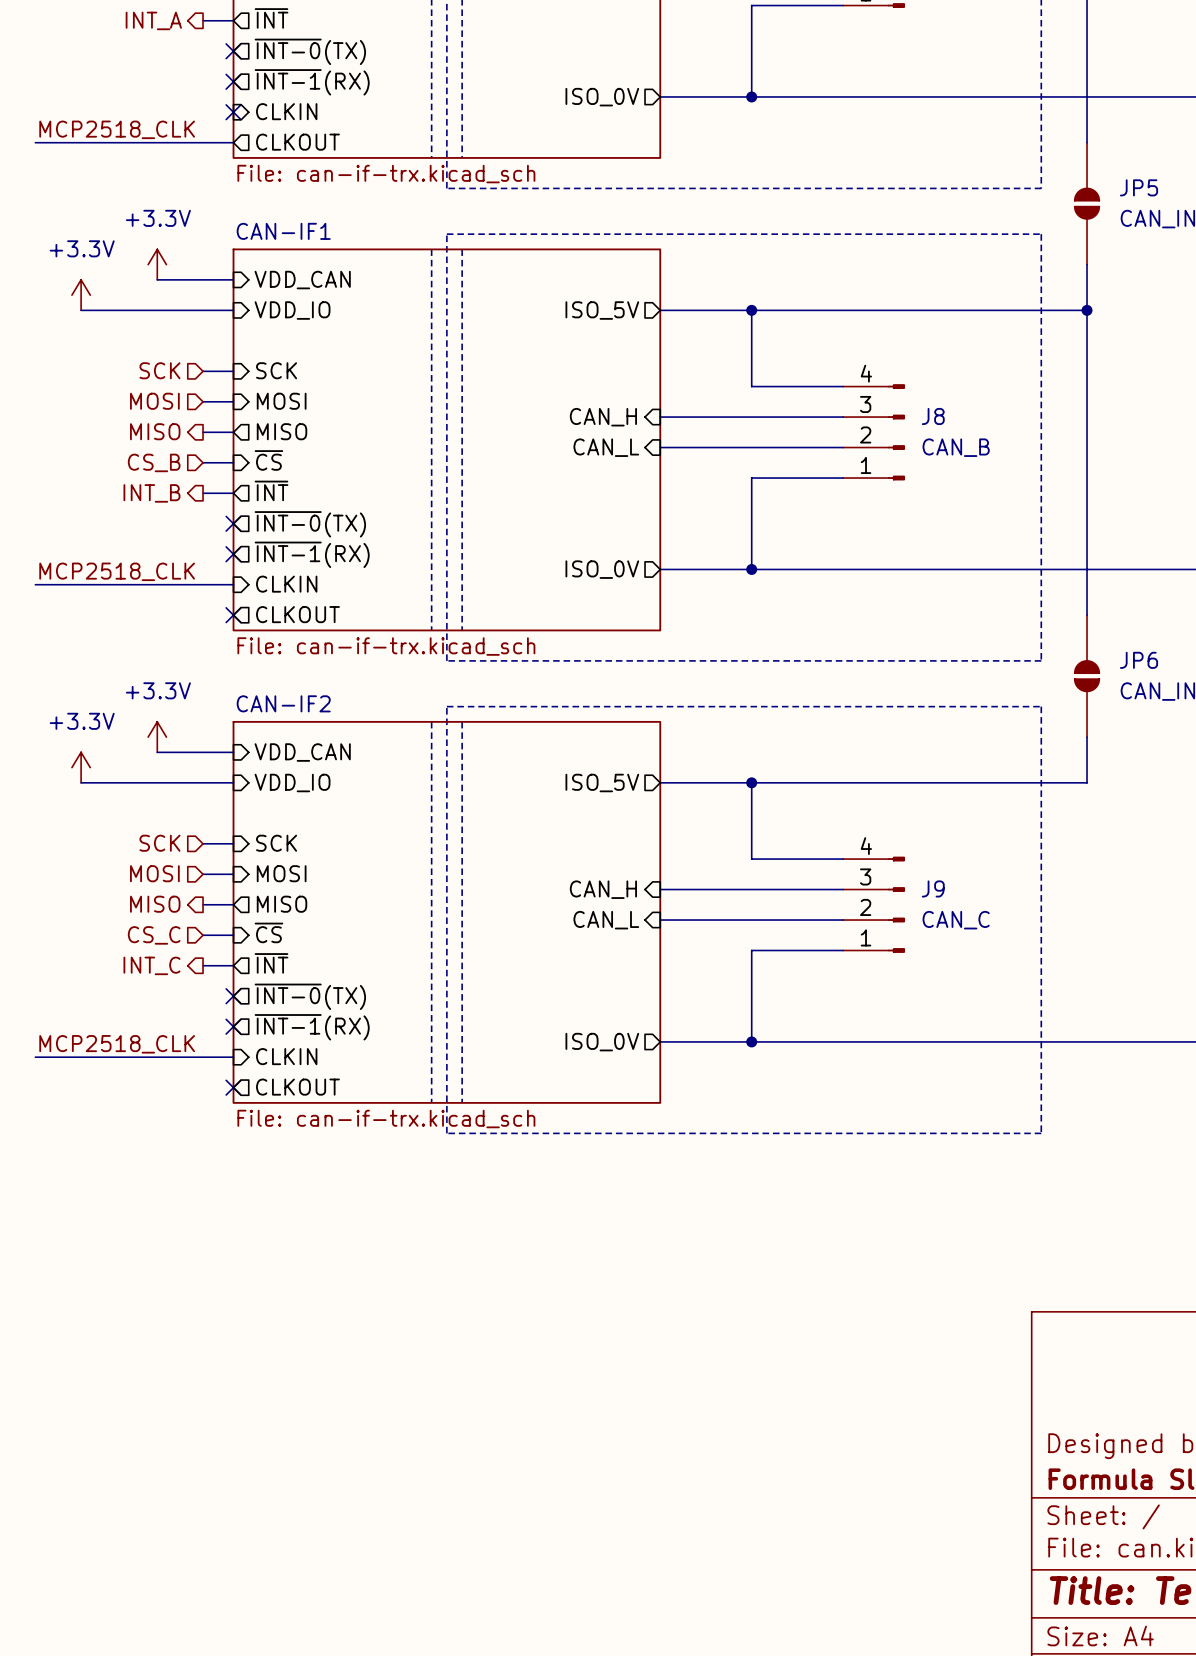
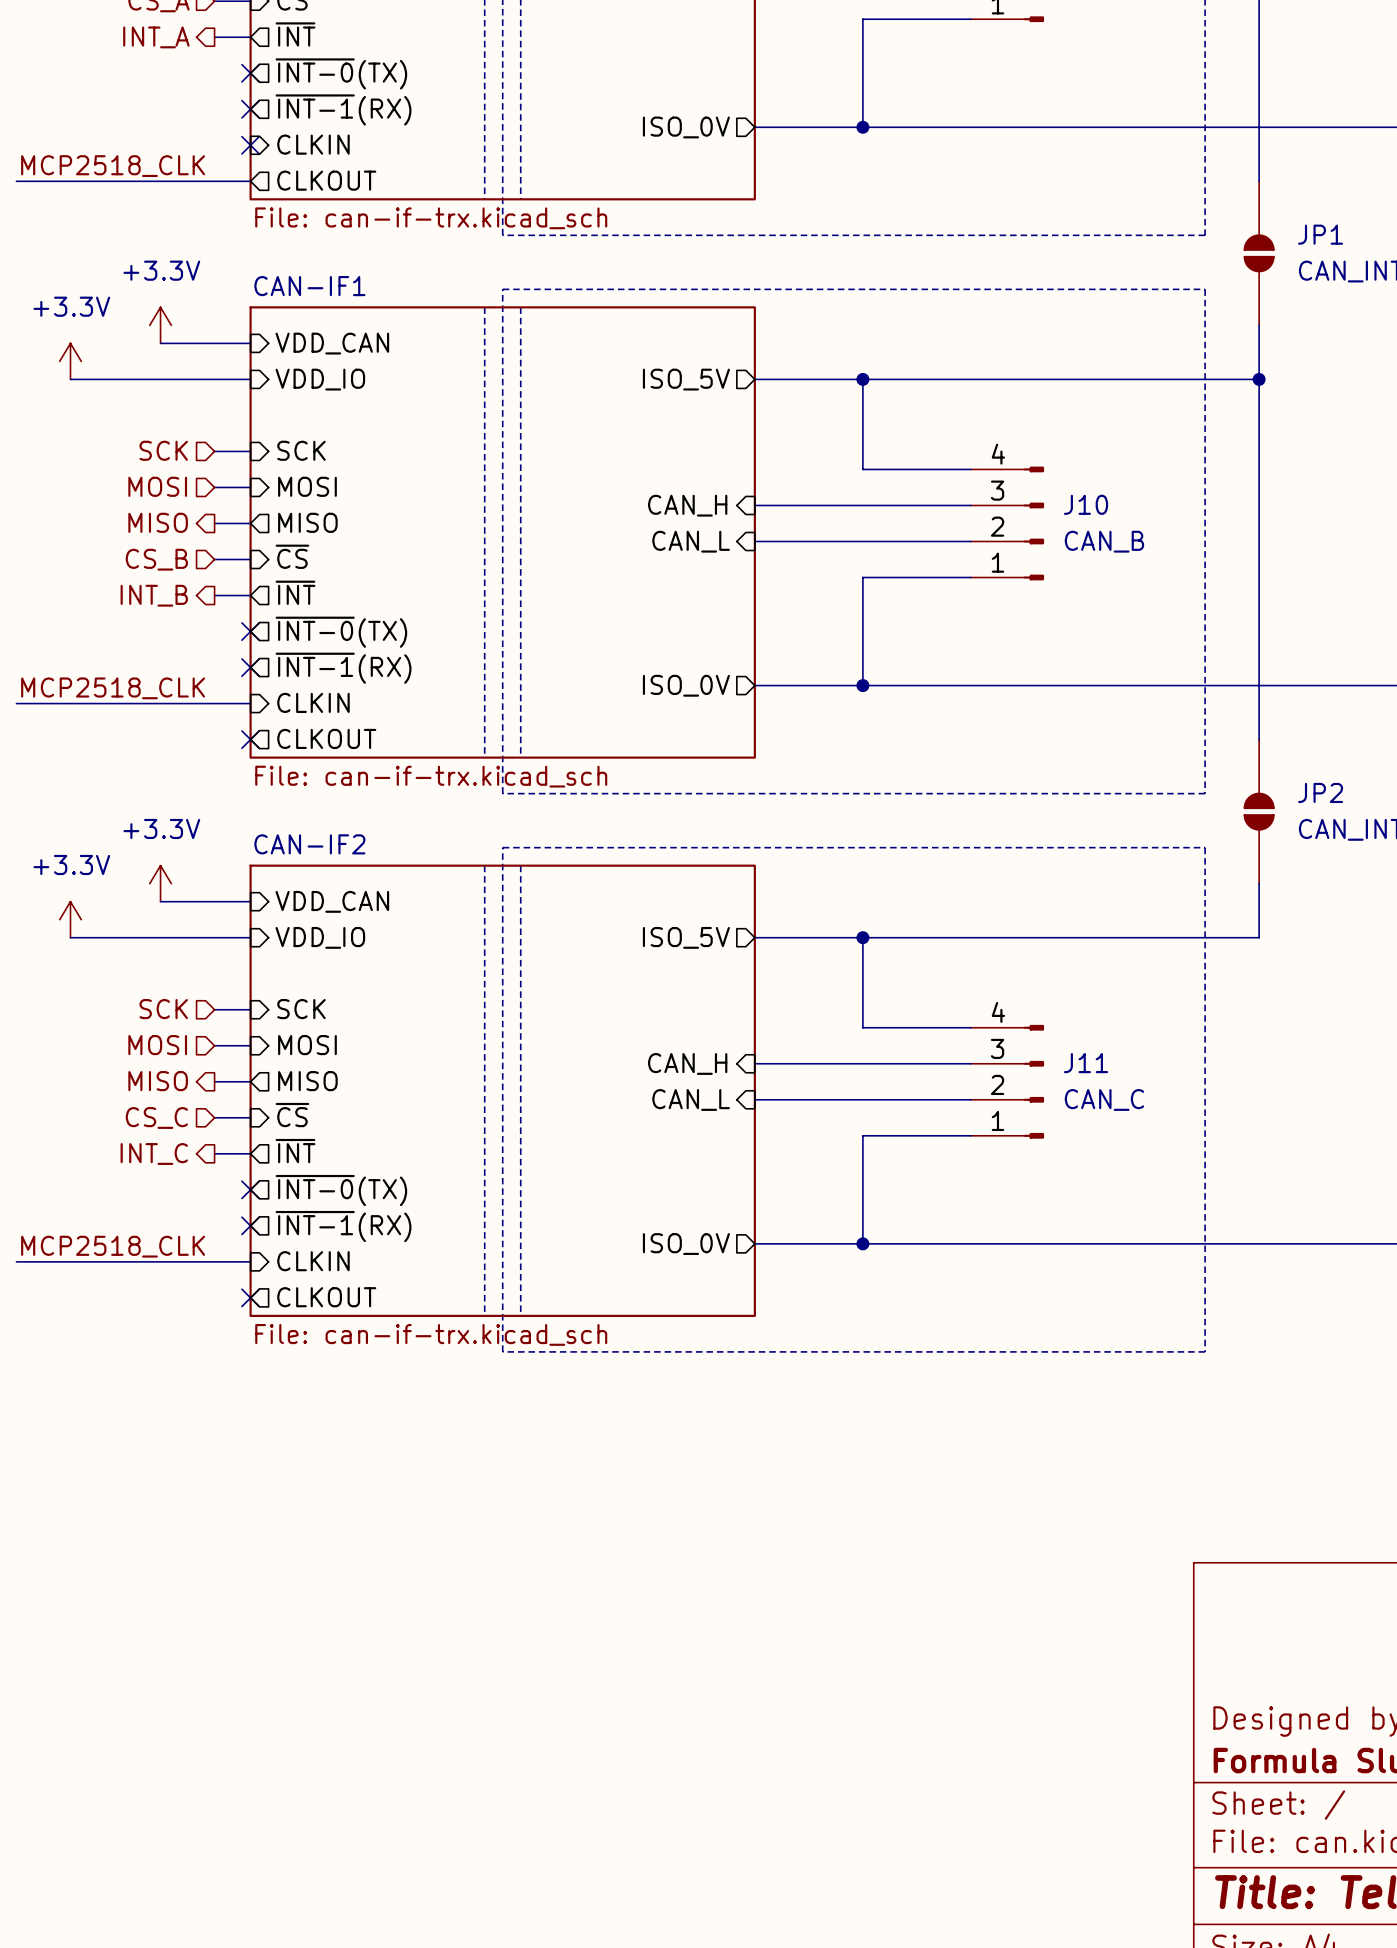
JP5 name: JP5 (1139, 187) -> JP1 (1320, 234)
J8 name: J8 (933, 416) -> J10 (1086, 504)
JP6 name: JP6 (1139, 660) -> JP2 (1320, 792)
J9 name: J9 (933, 888) -> J11 (1086, 1063)

